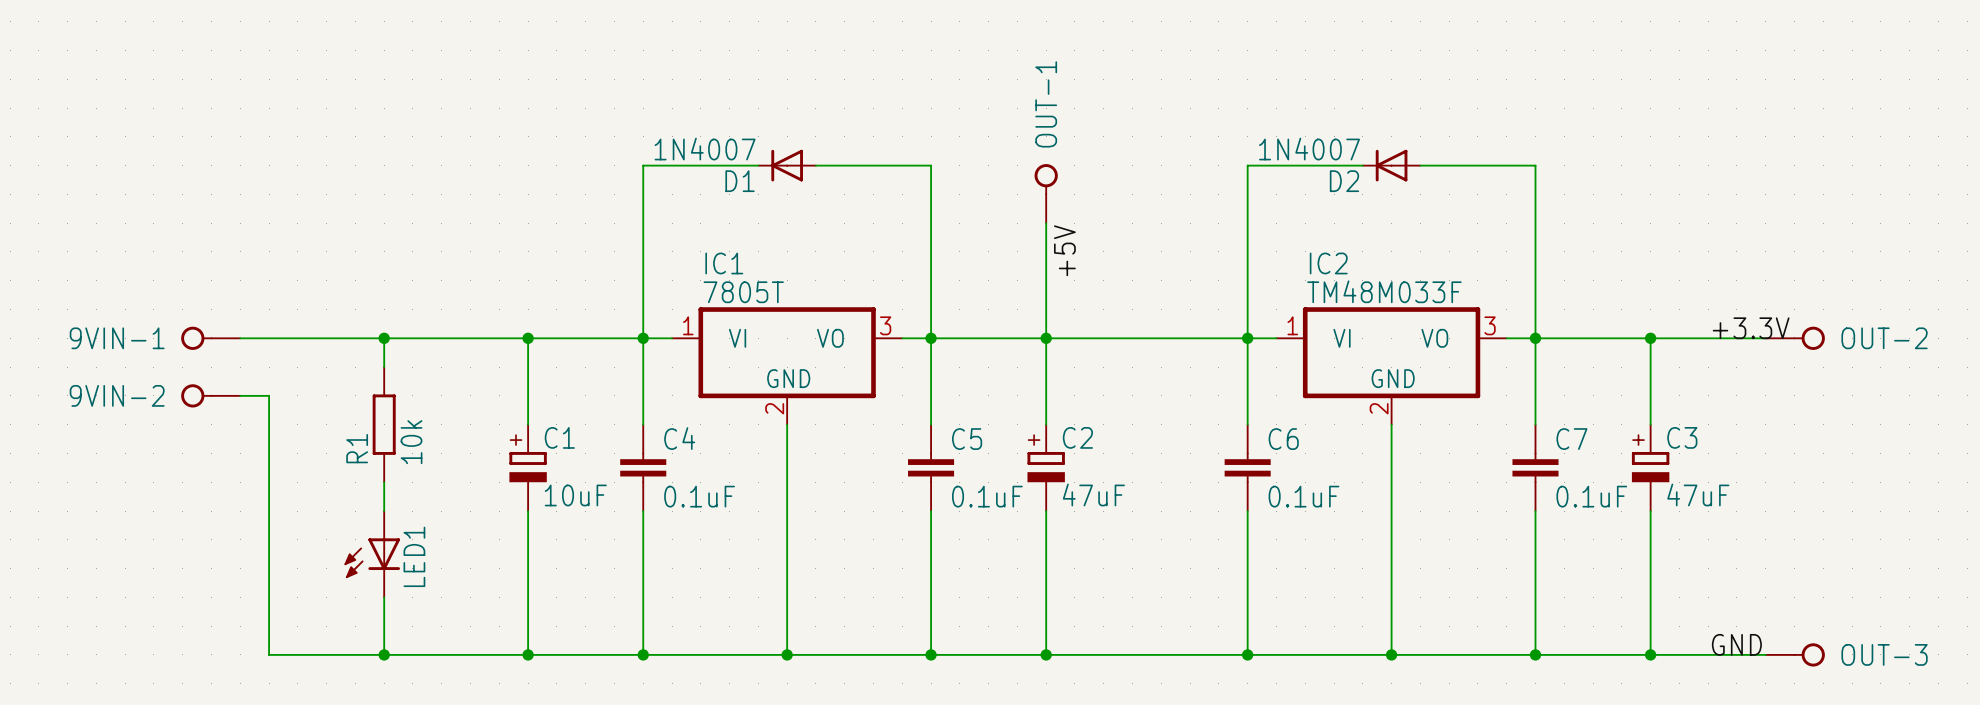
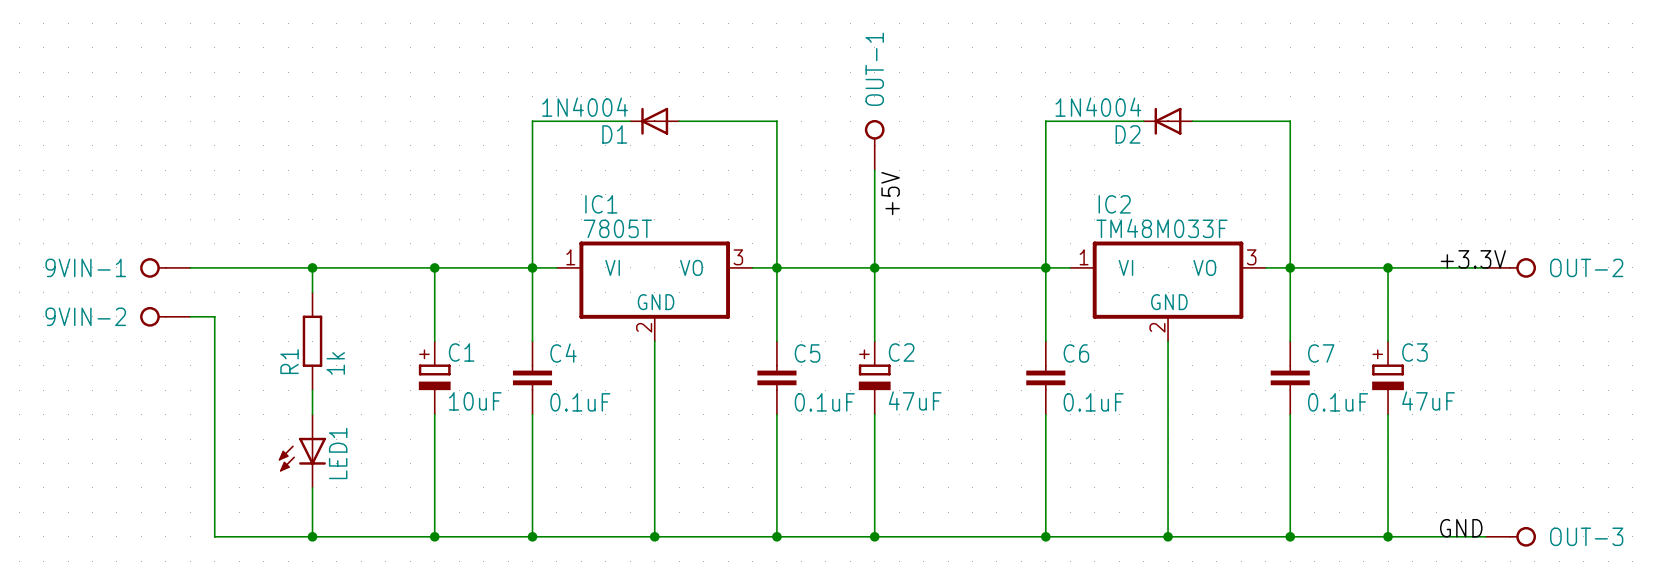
D1 value: 1N4007 (705, 149) -> 1N4004 (585, 107)
D2 value: 1N4007 (1309, 149) -> 1N4004 (1098, 107)
R1 value: 10k (411, 442) -> 1k (335, 363)

